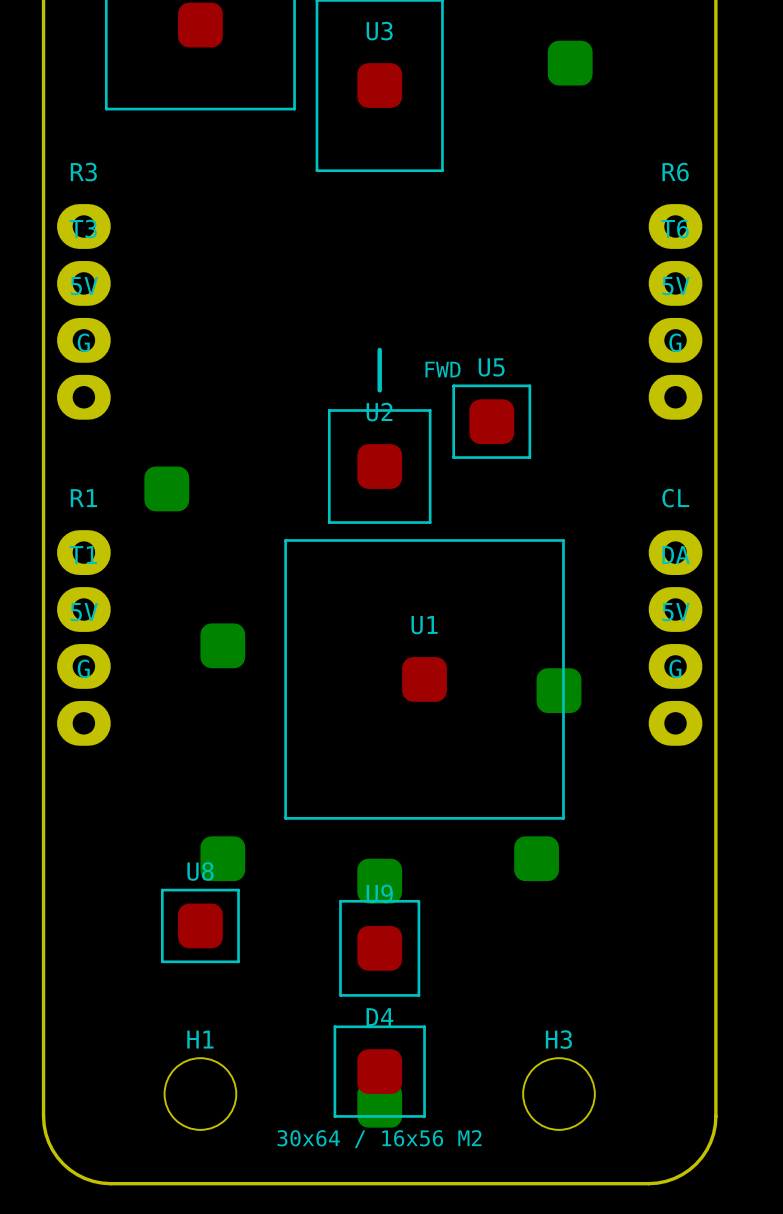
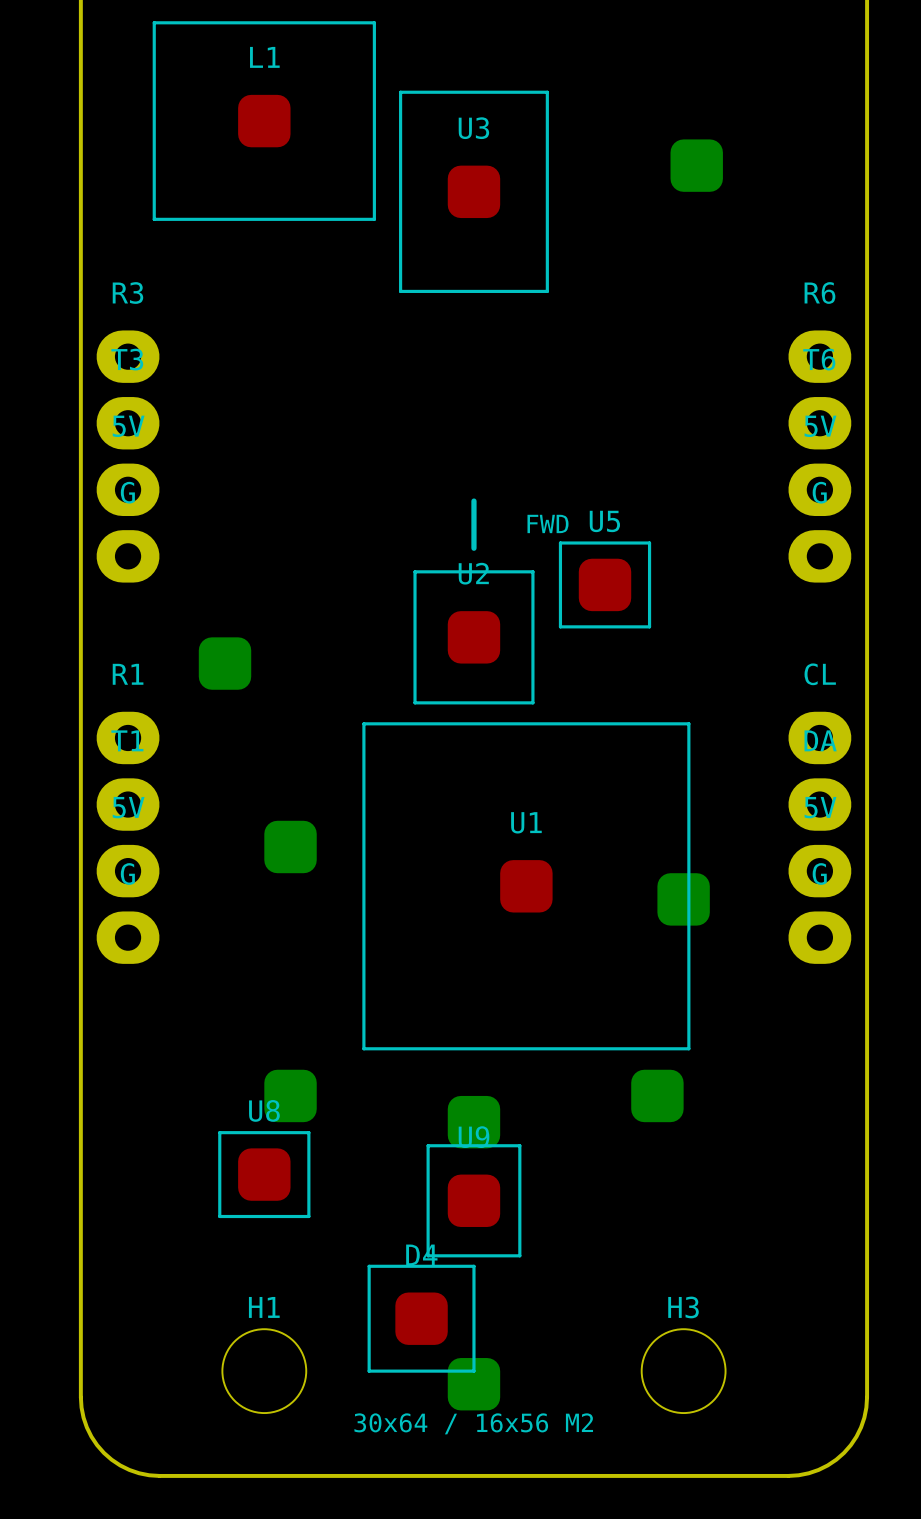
line: (334, 1026) (424, 1026) (424, 1116) (334, 1116) (334, 1026) -> (369, 1266) (473, 1266) (473, 1371) (369, 1371) (369, 1266)
D4 position: (379, 1071) -> (421, 1318)

